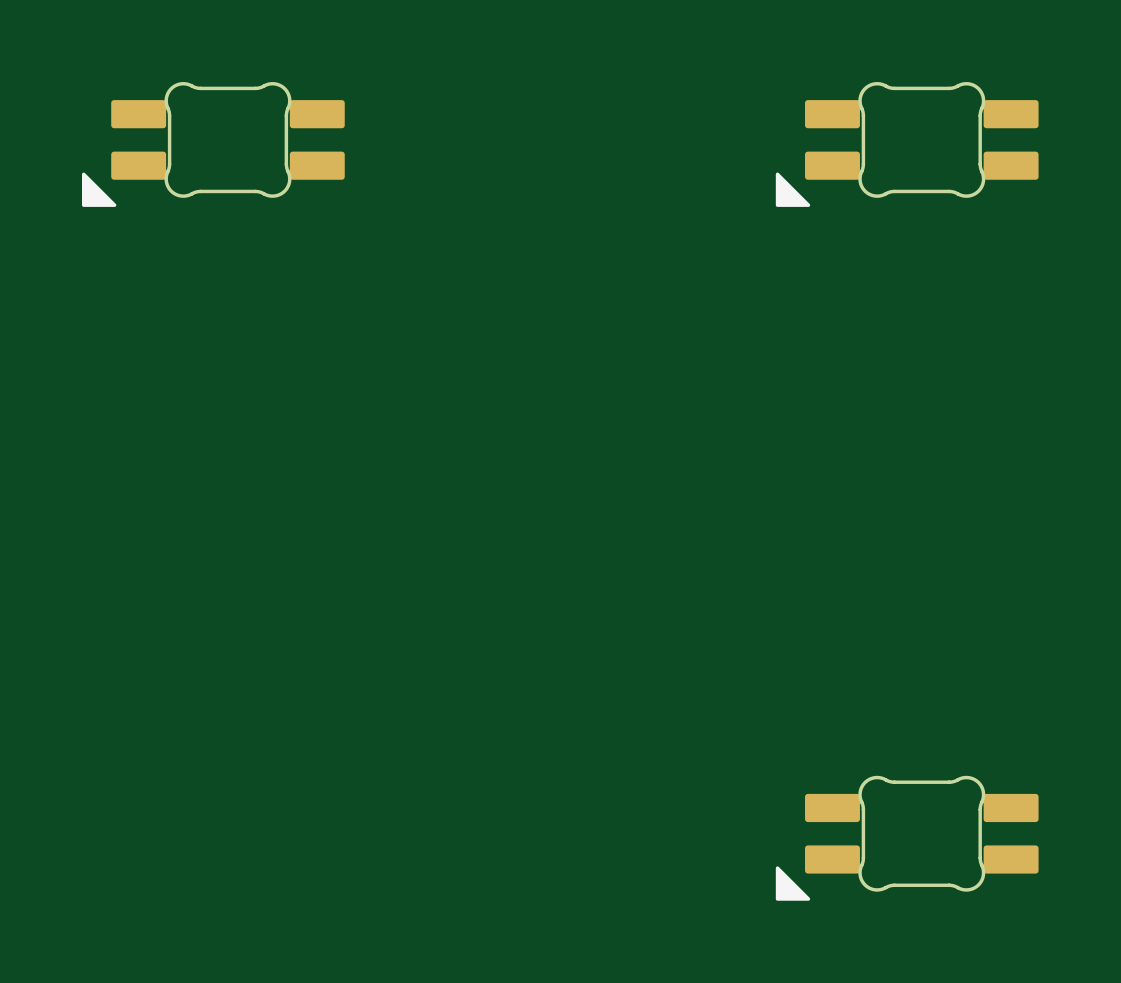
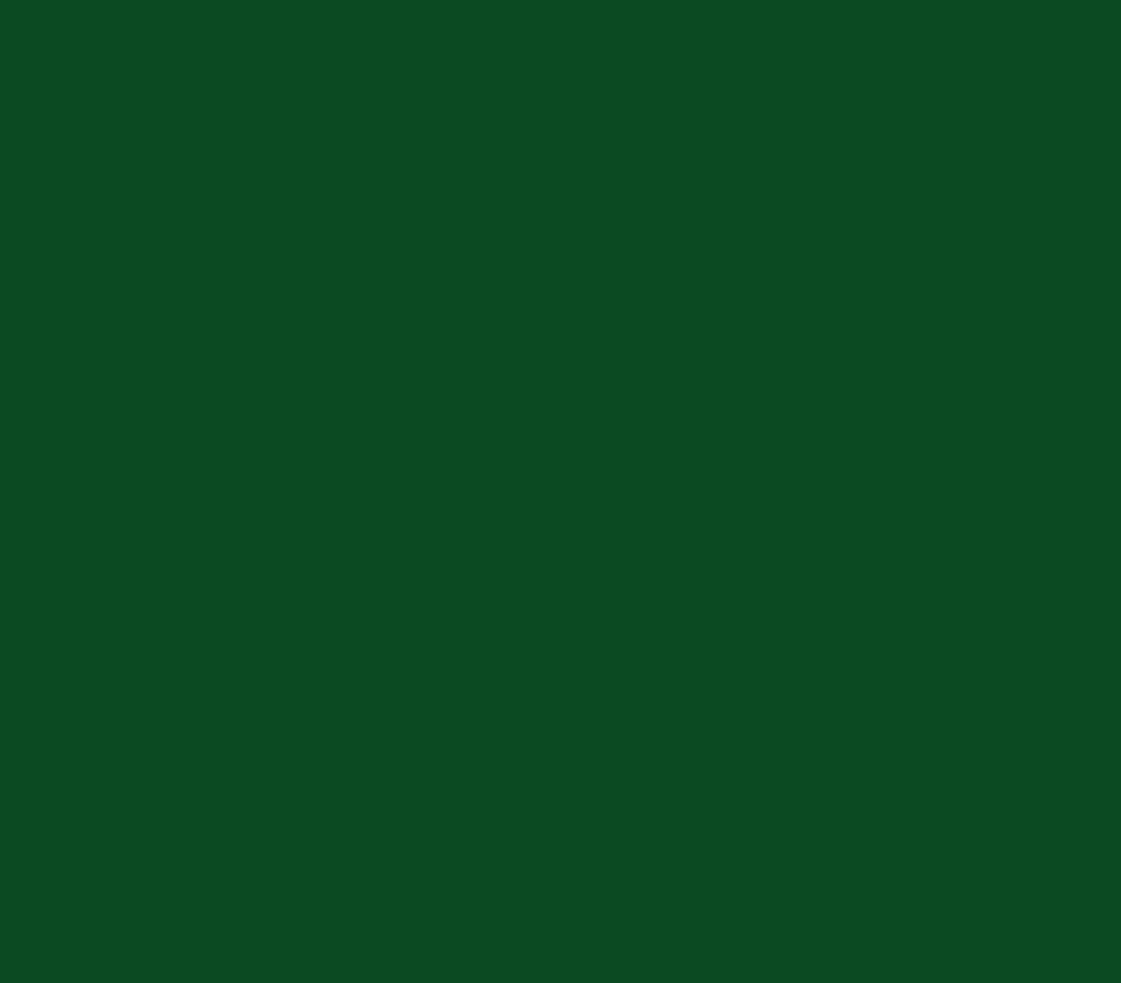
part: (213, 144) -> none
part: (907, 144) -> none
part: (907, 838) -> none

